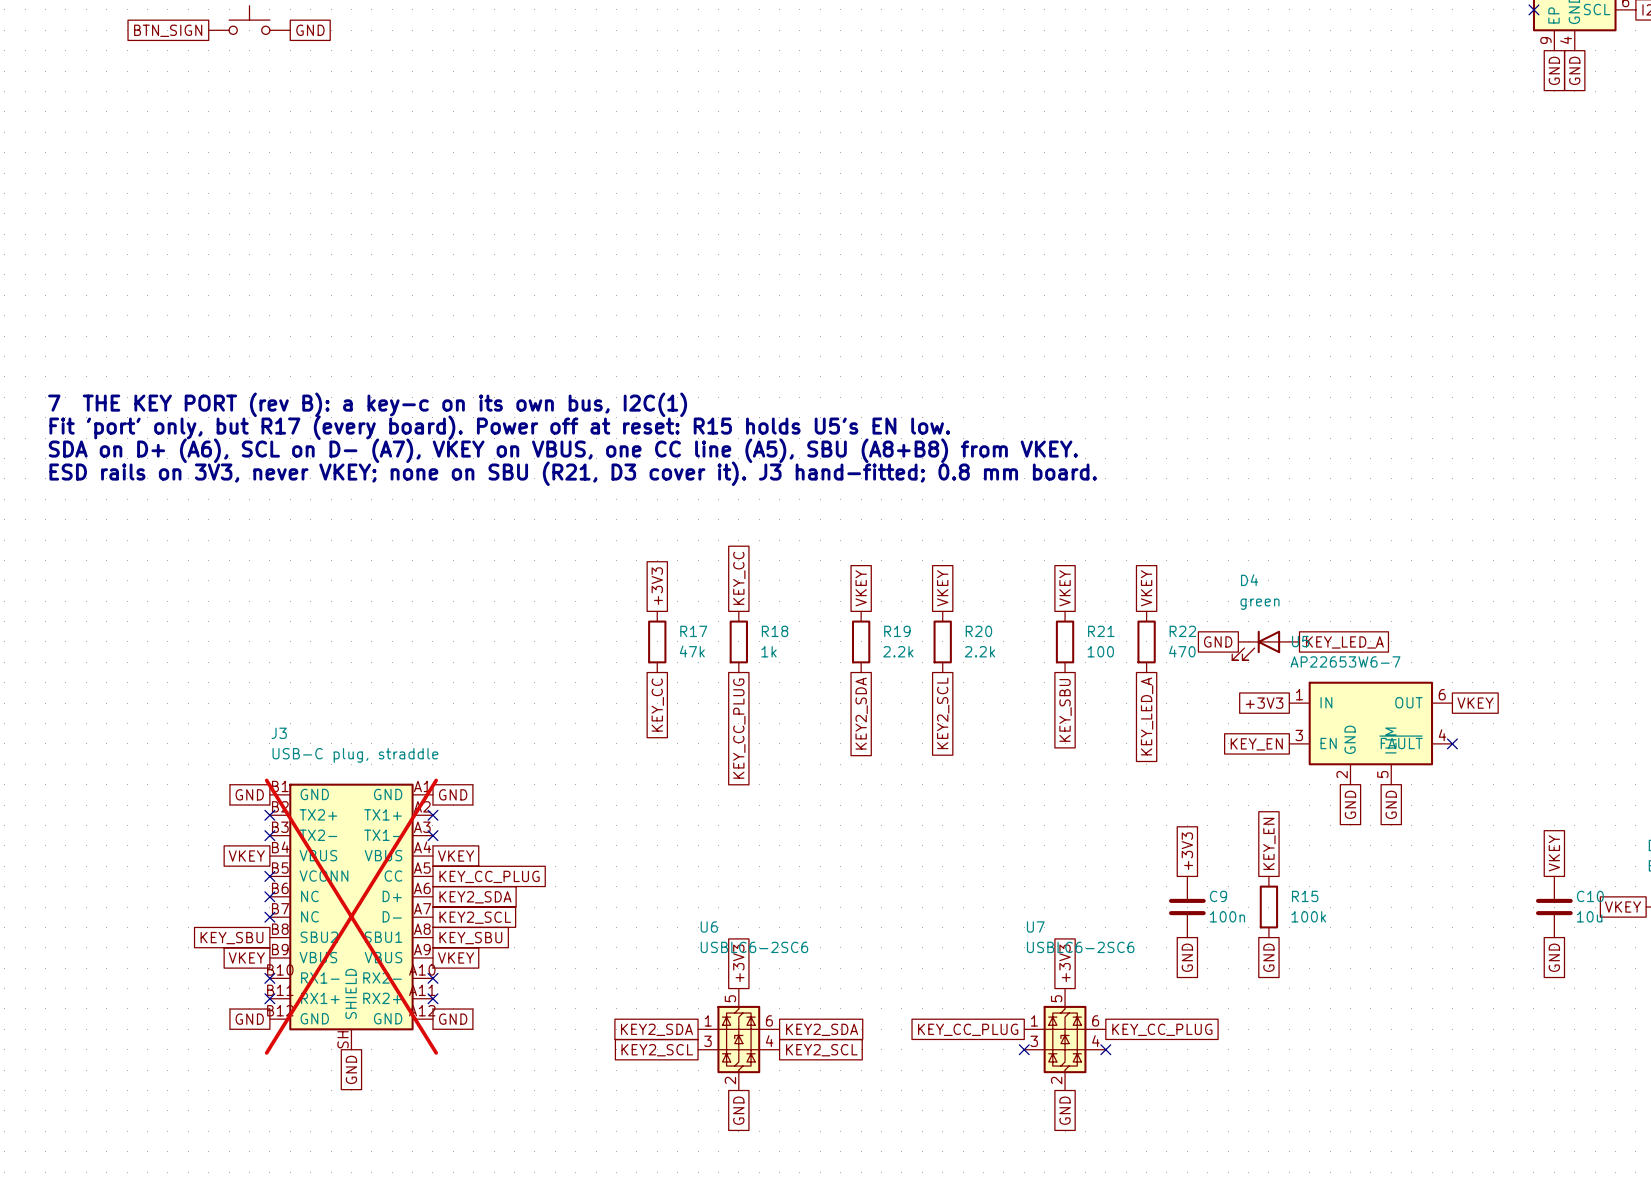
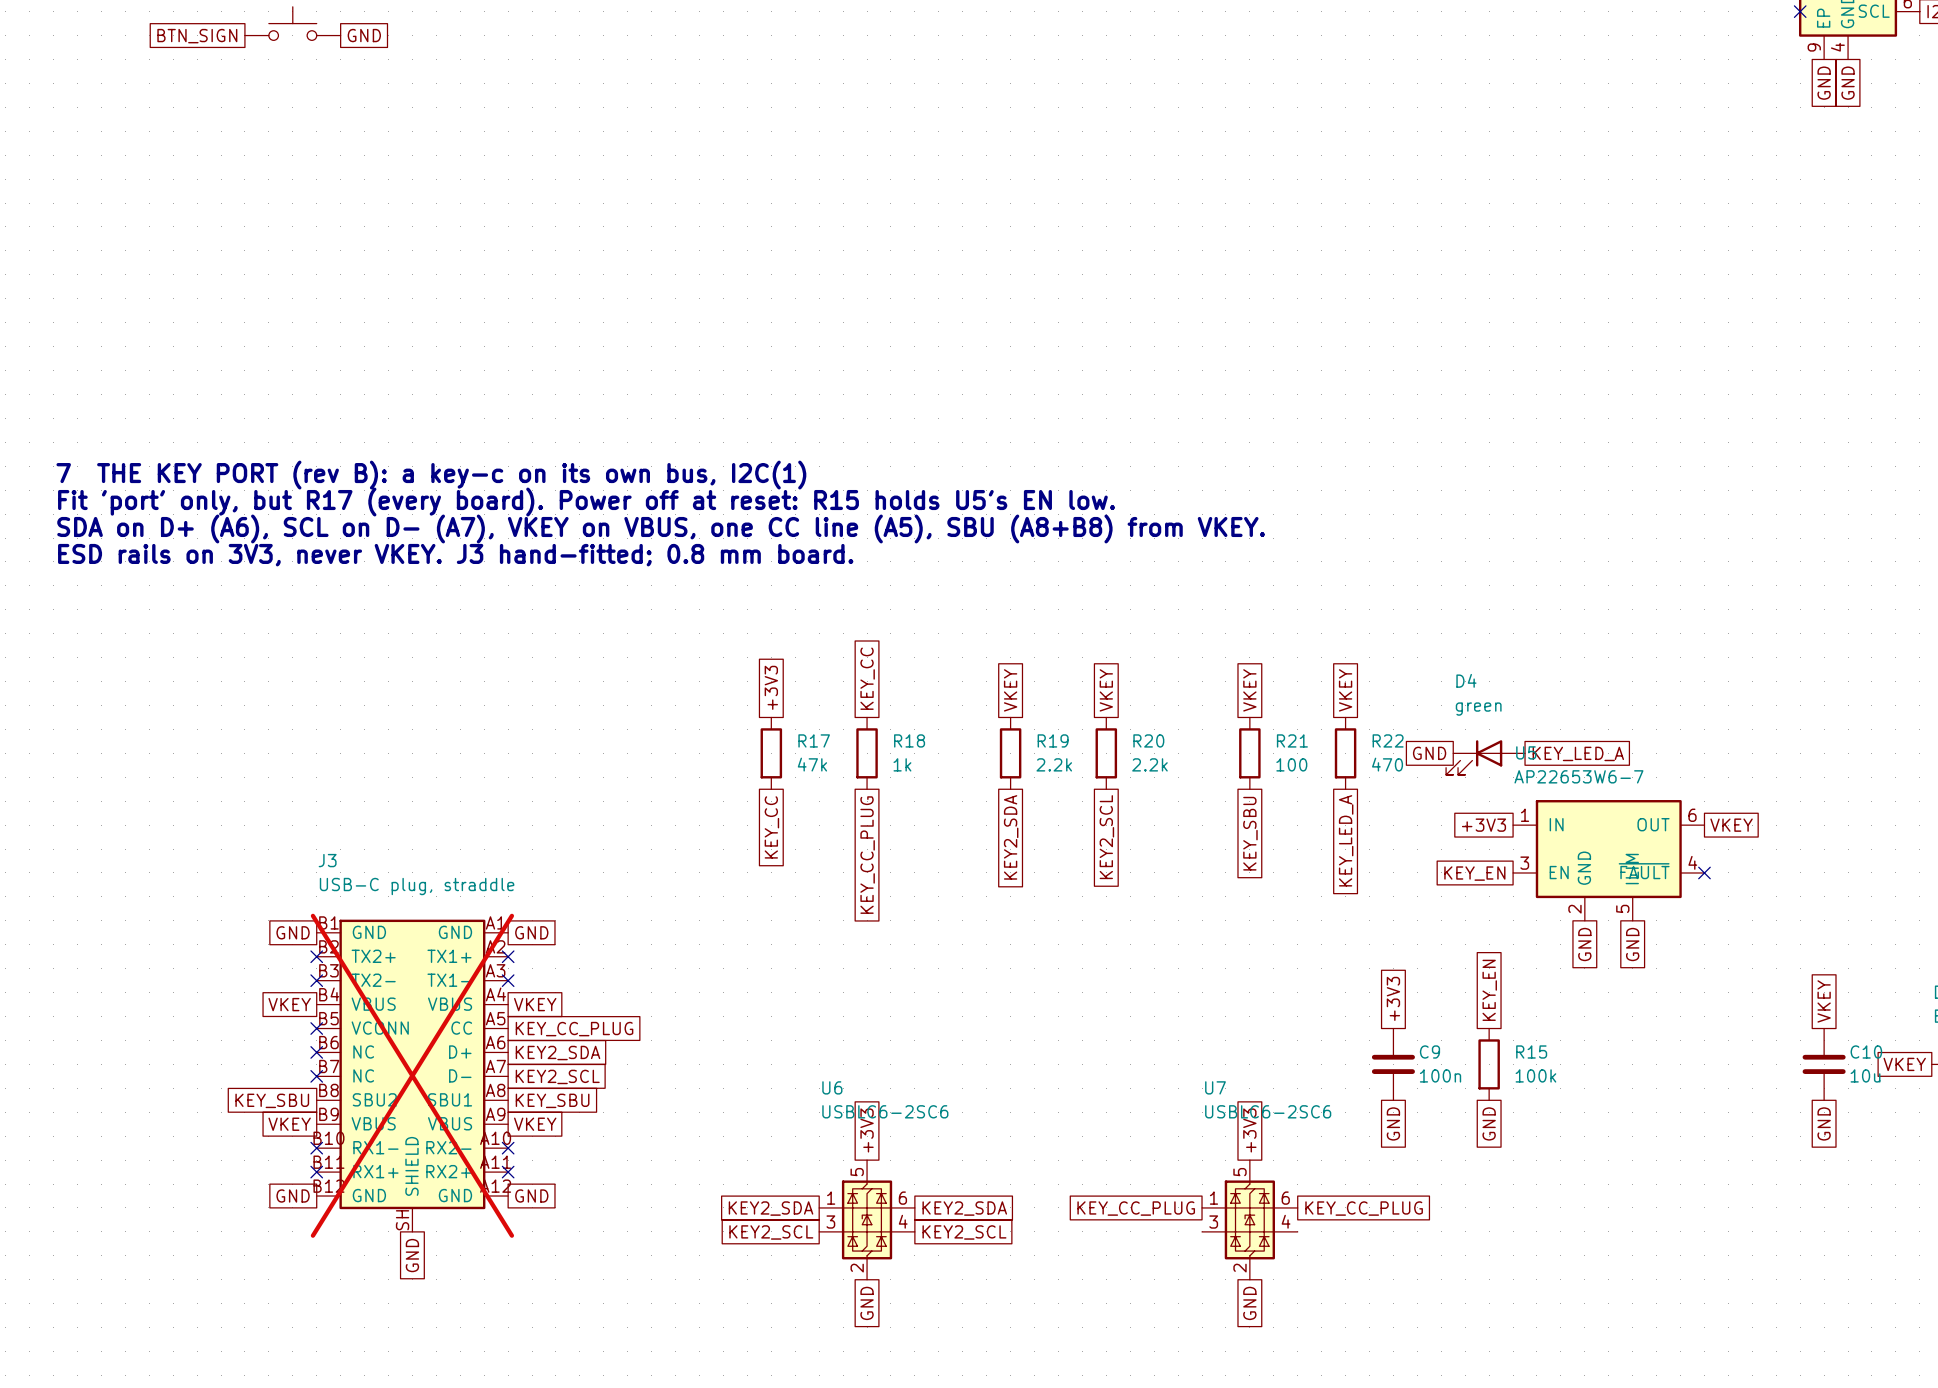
text: ESD rails on 3V3, never VKEY; none on SBU (R21, D3 cover it). J3 hand-fitted; 0.8 mm board. (573, 473) -> ESD rails on 3V3, never VKEY. J3 hand-fitted; 0.8 mm board. (455, 555)
no-connect mark: (1024, 1049) -> none
no-connect mark: (1105, 1049) -> none

